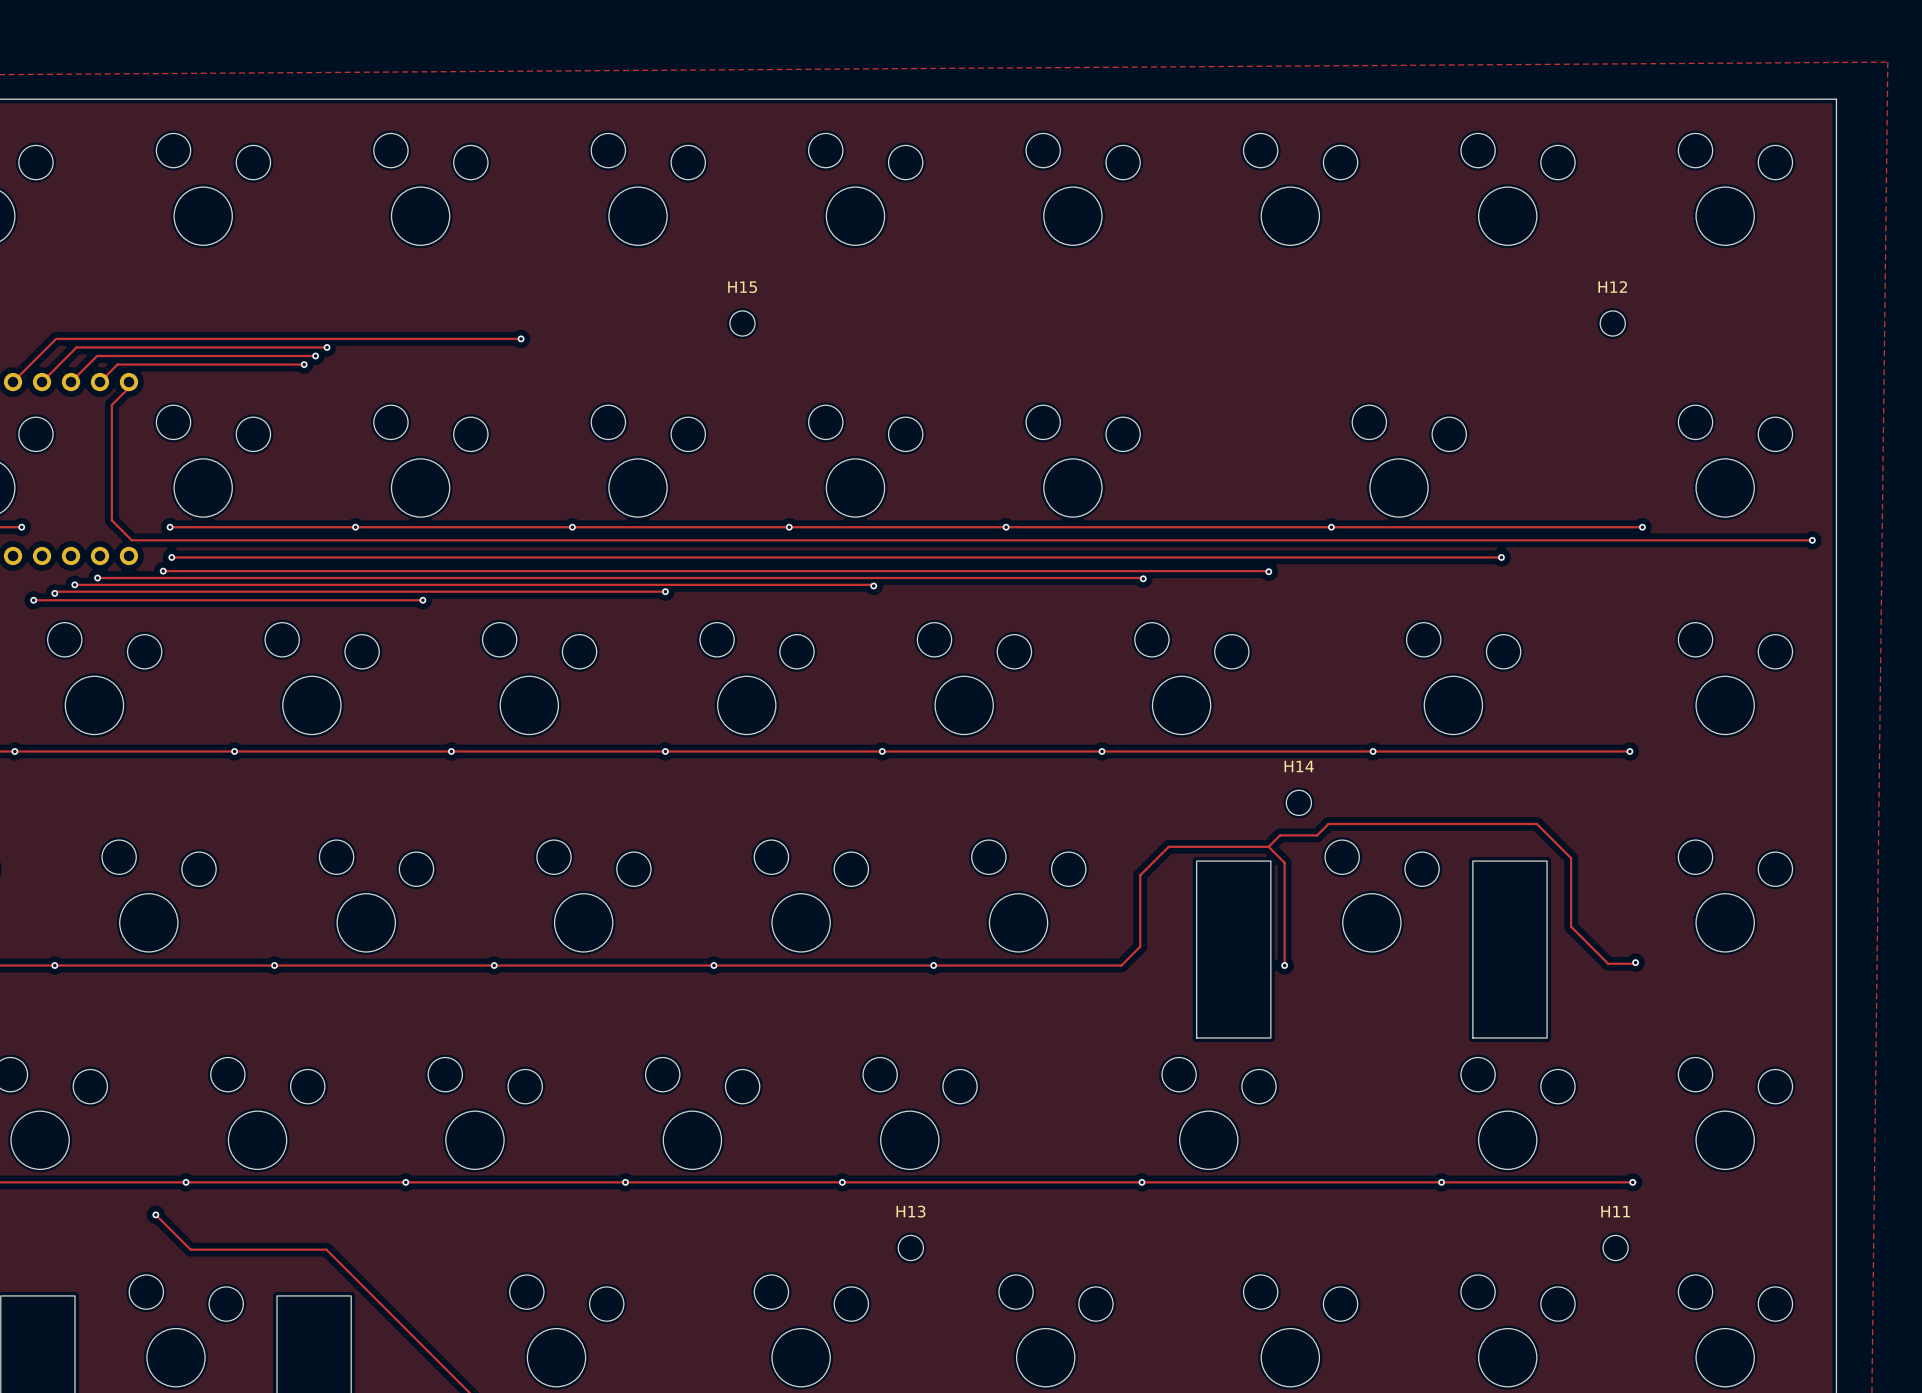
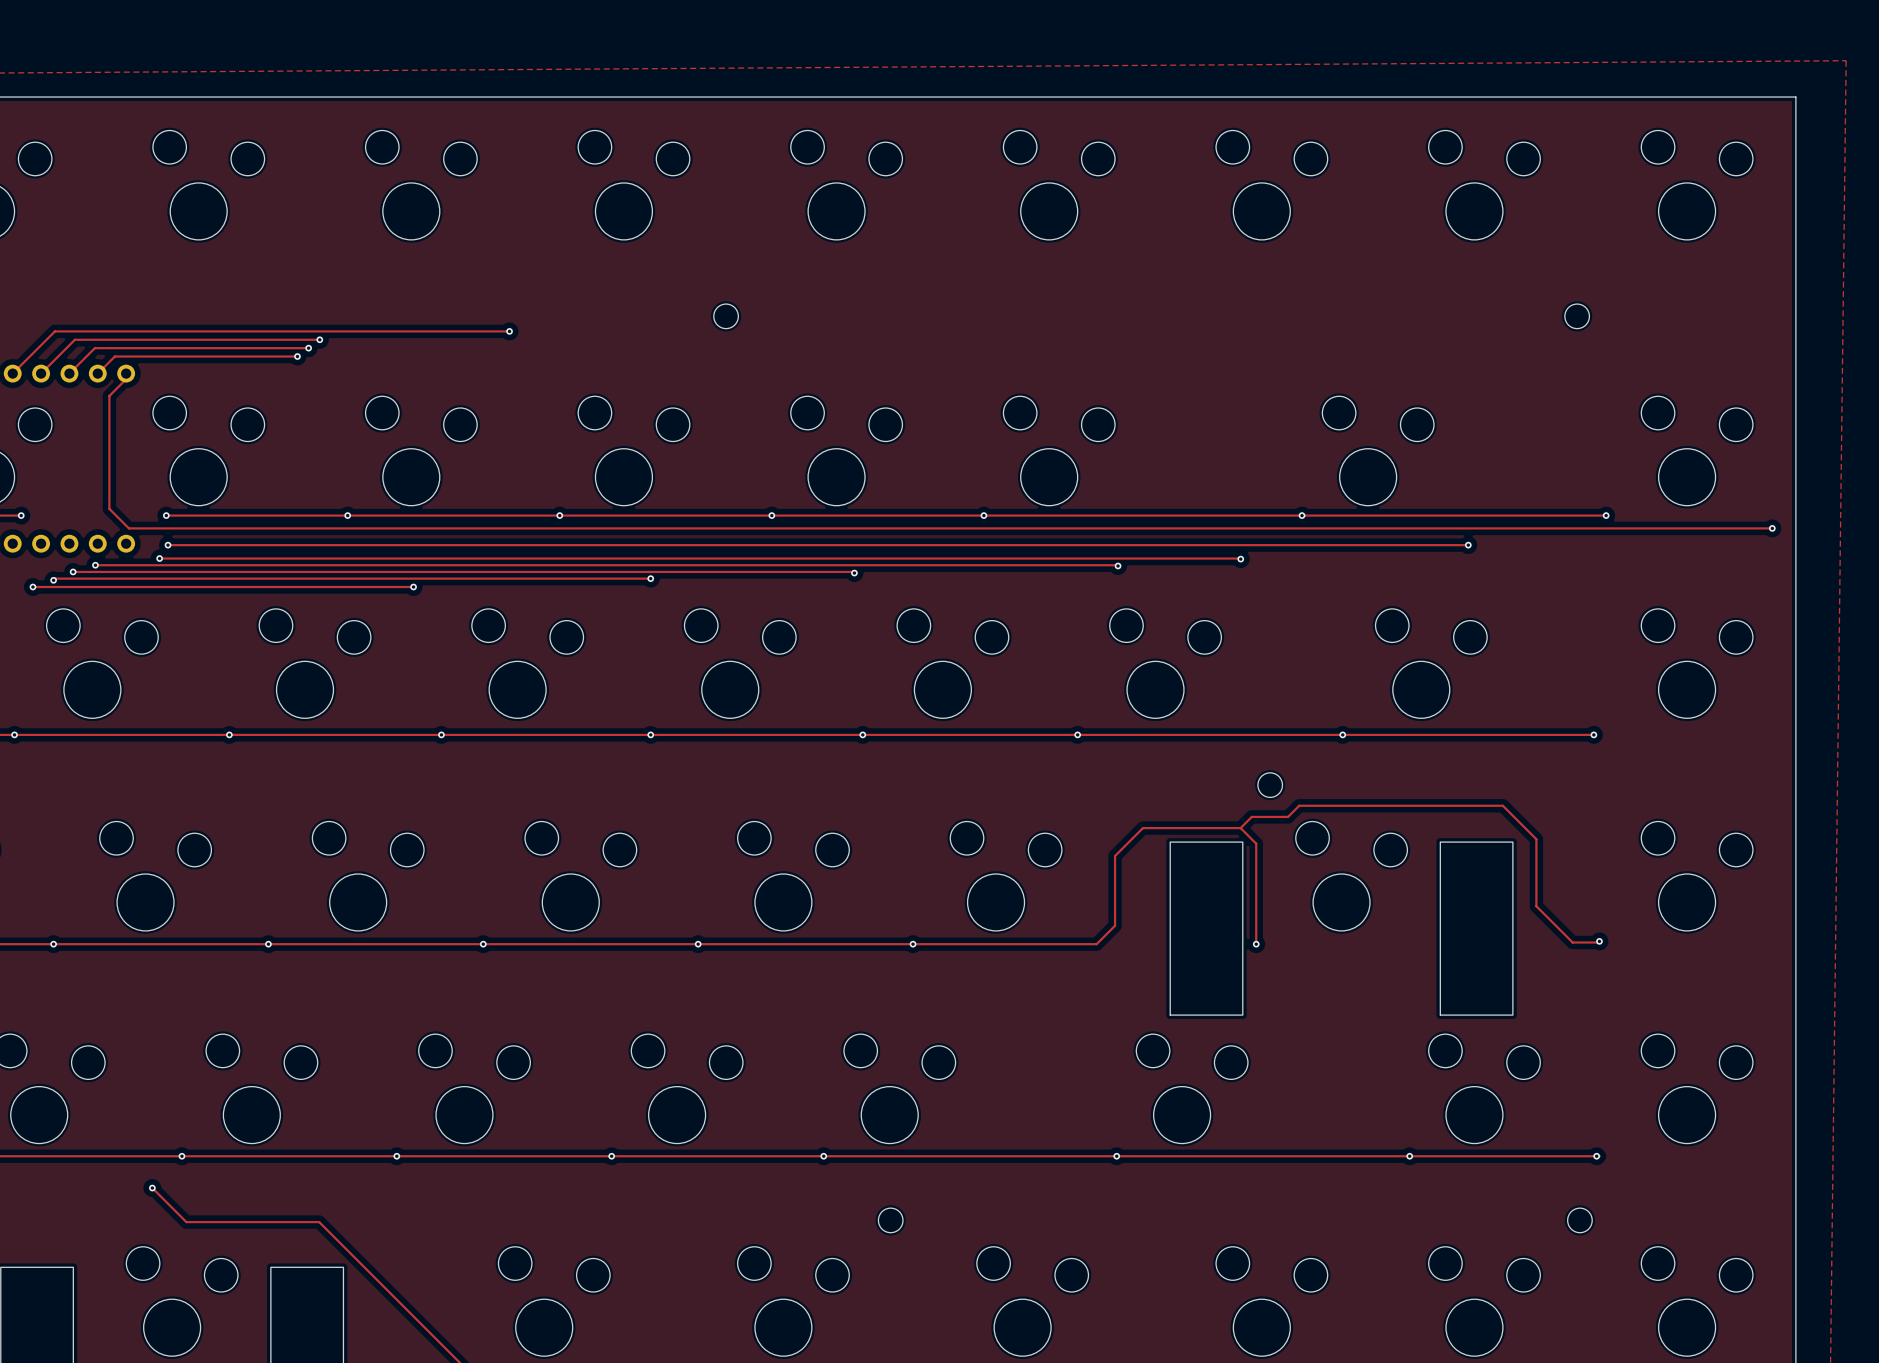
H15 name: H15 (742, 287) -> none
H12 name: H12 (1612, 287) -> none
H14 name: H14 (1299, 766) -> none
H13 name: H13 (910, 1211) -> none
H11 name: H11 (1615, 1211) -> none

